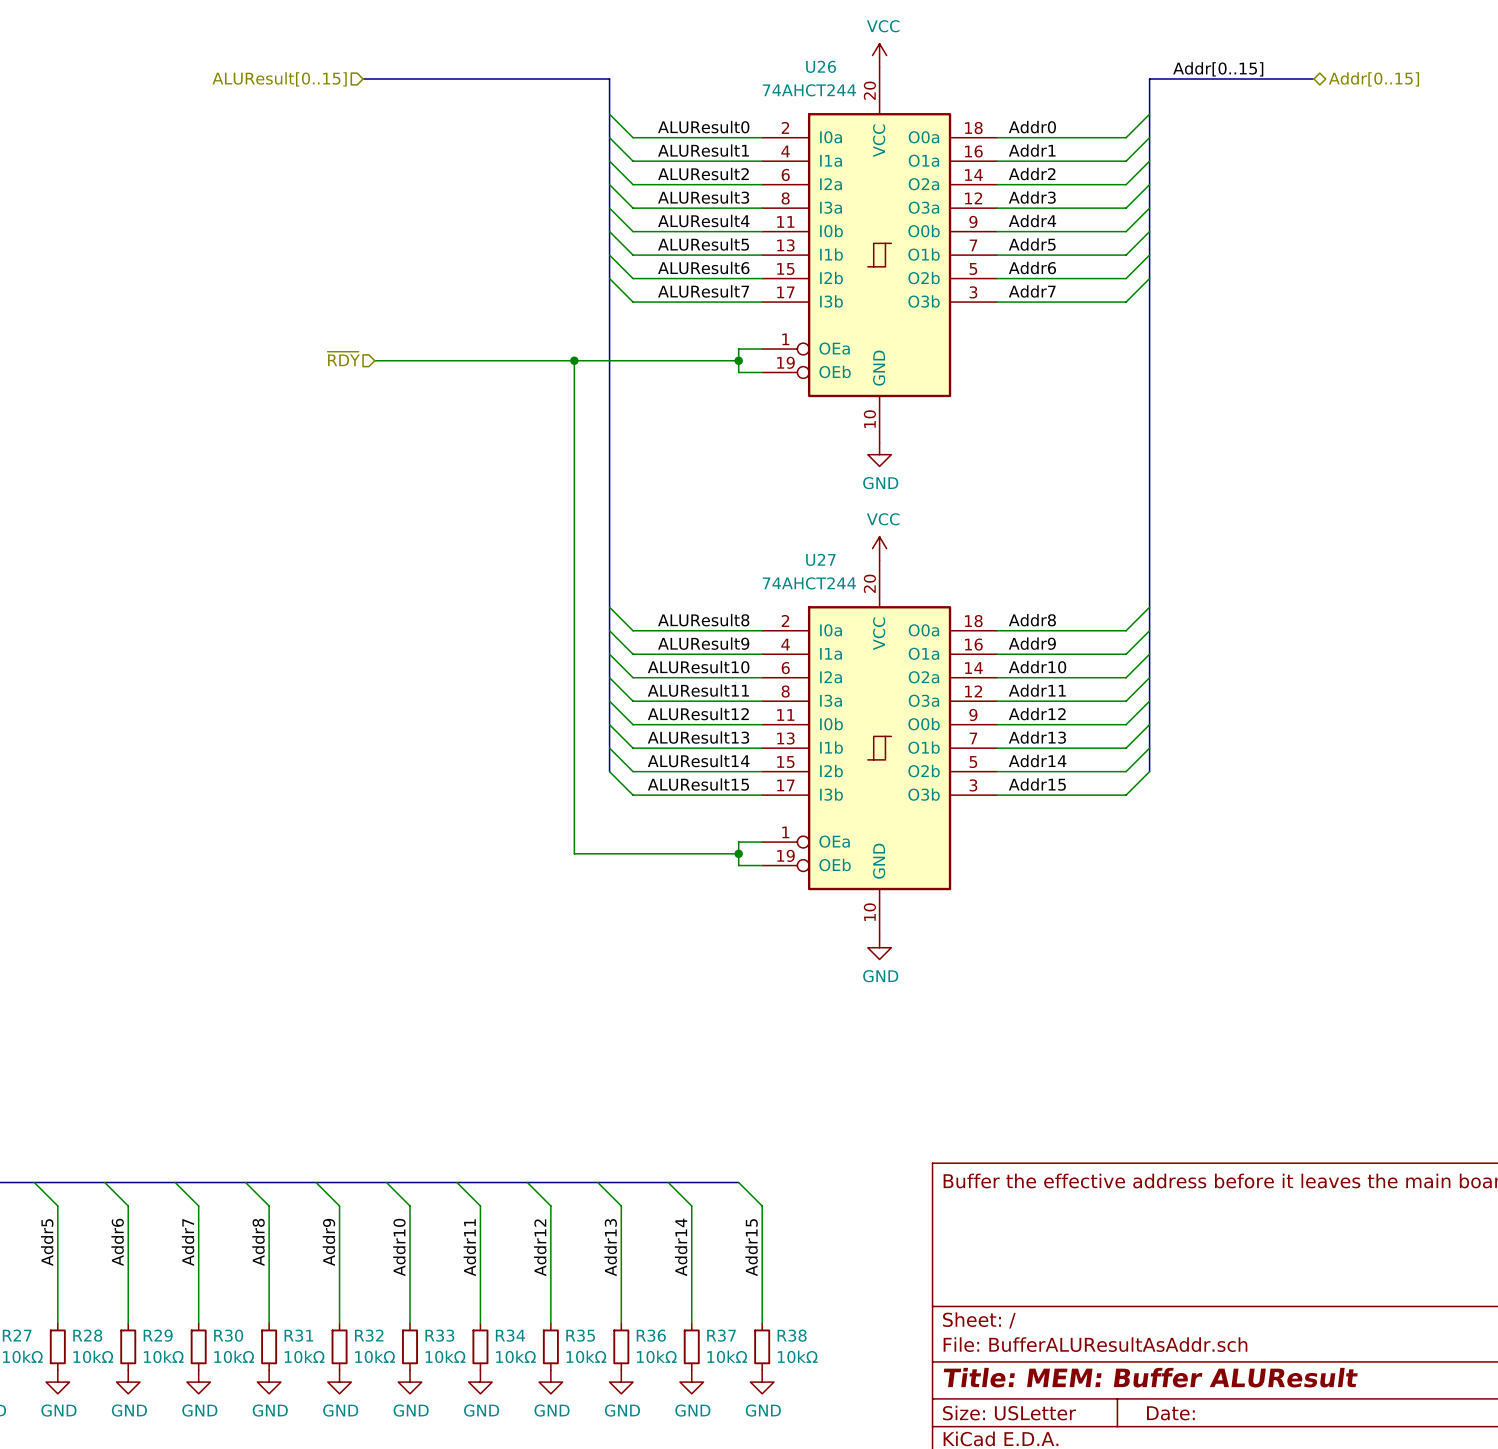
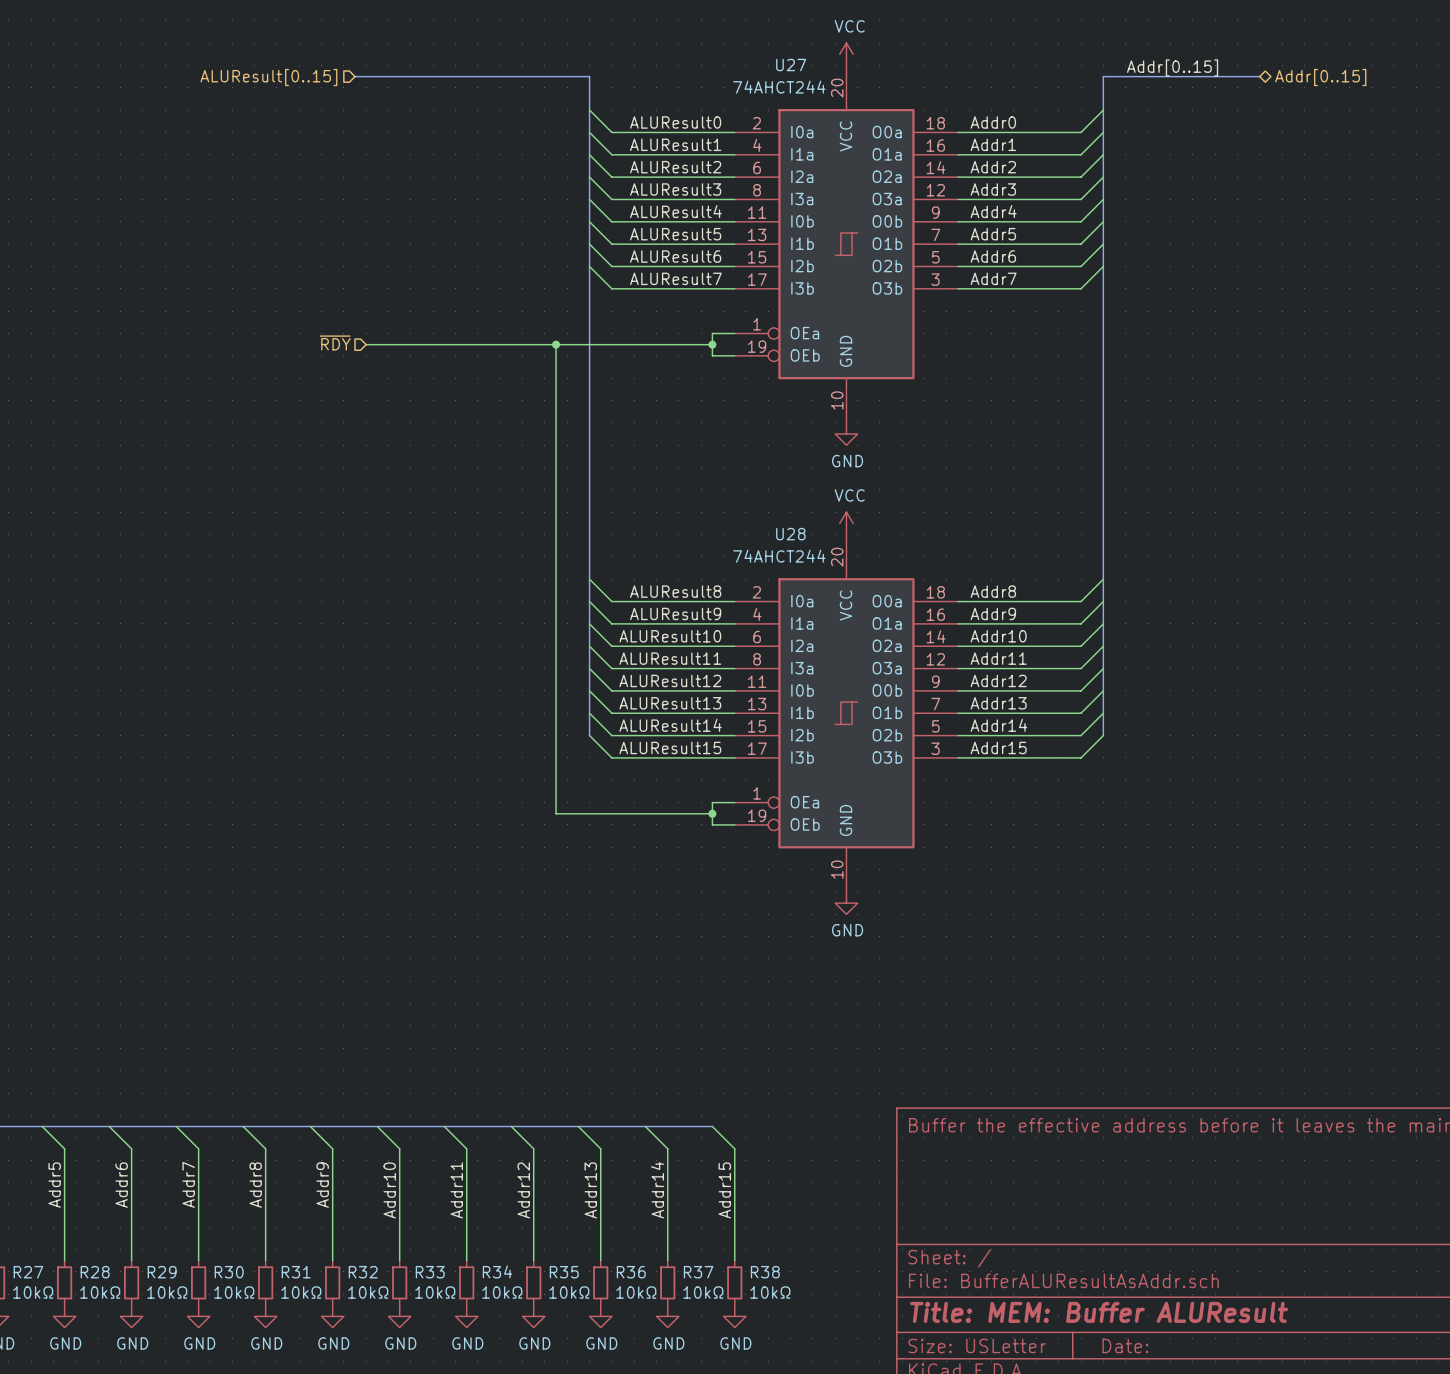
U26 name: U26 (821, 66) -> U27 (791, 65)
U27 name: U27 (820, 559) -> U28 (790, 534)

